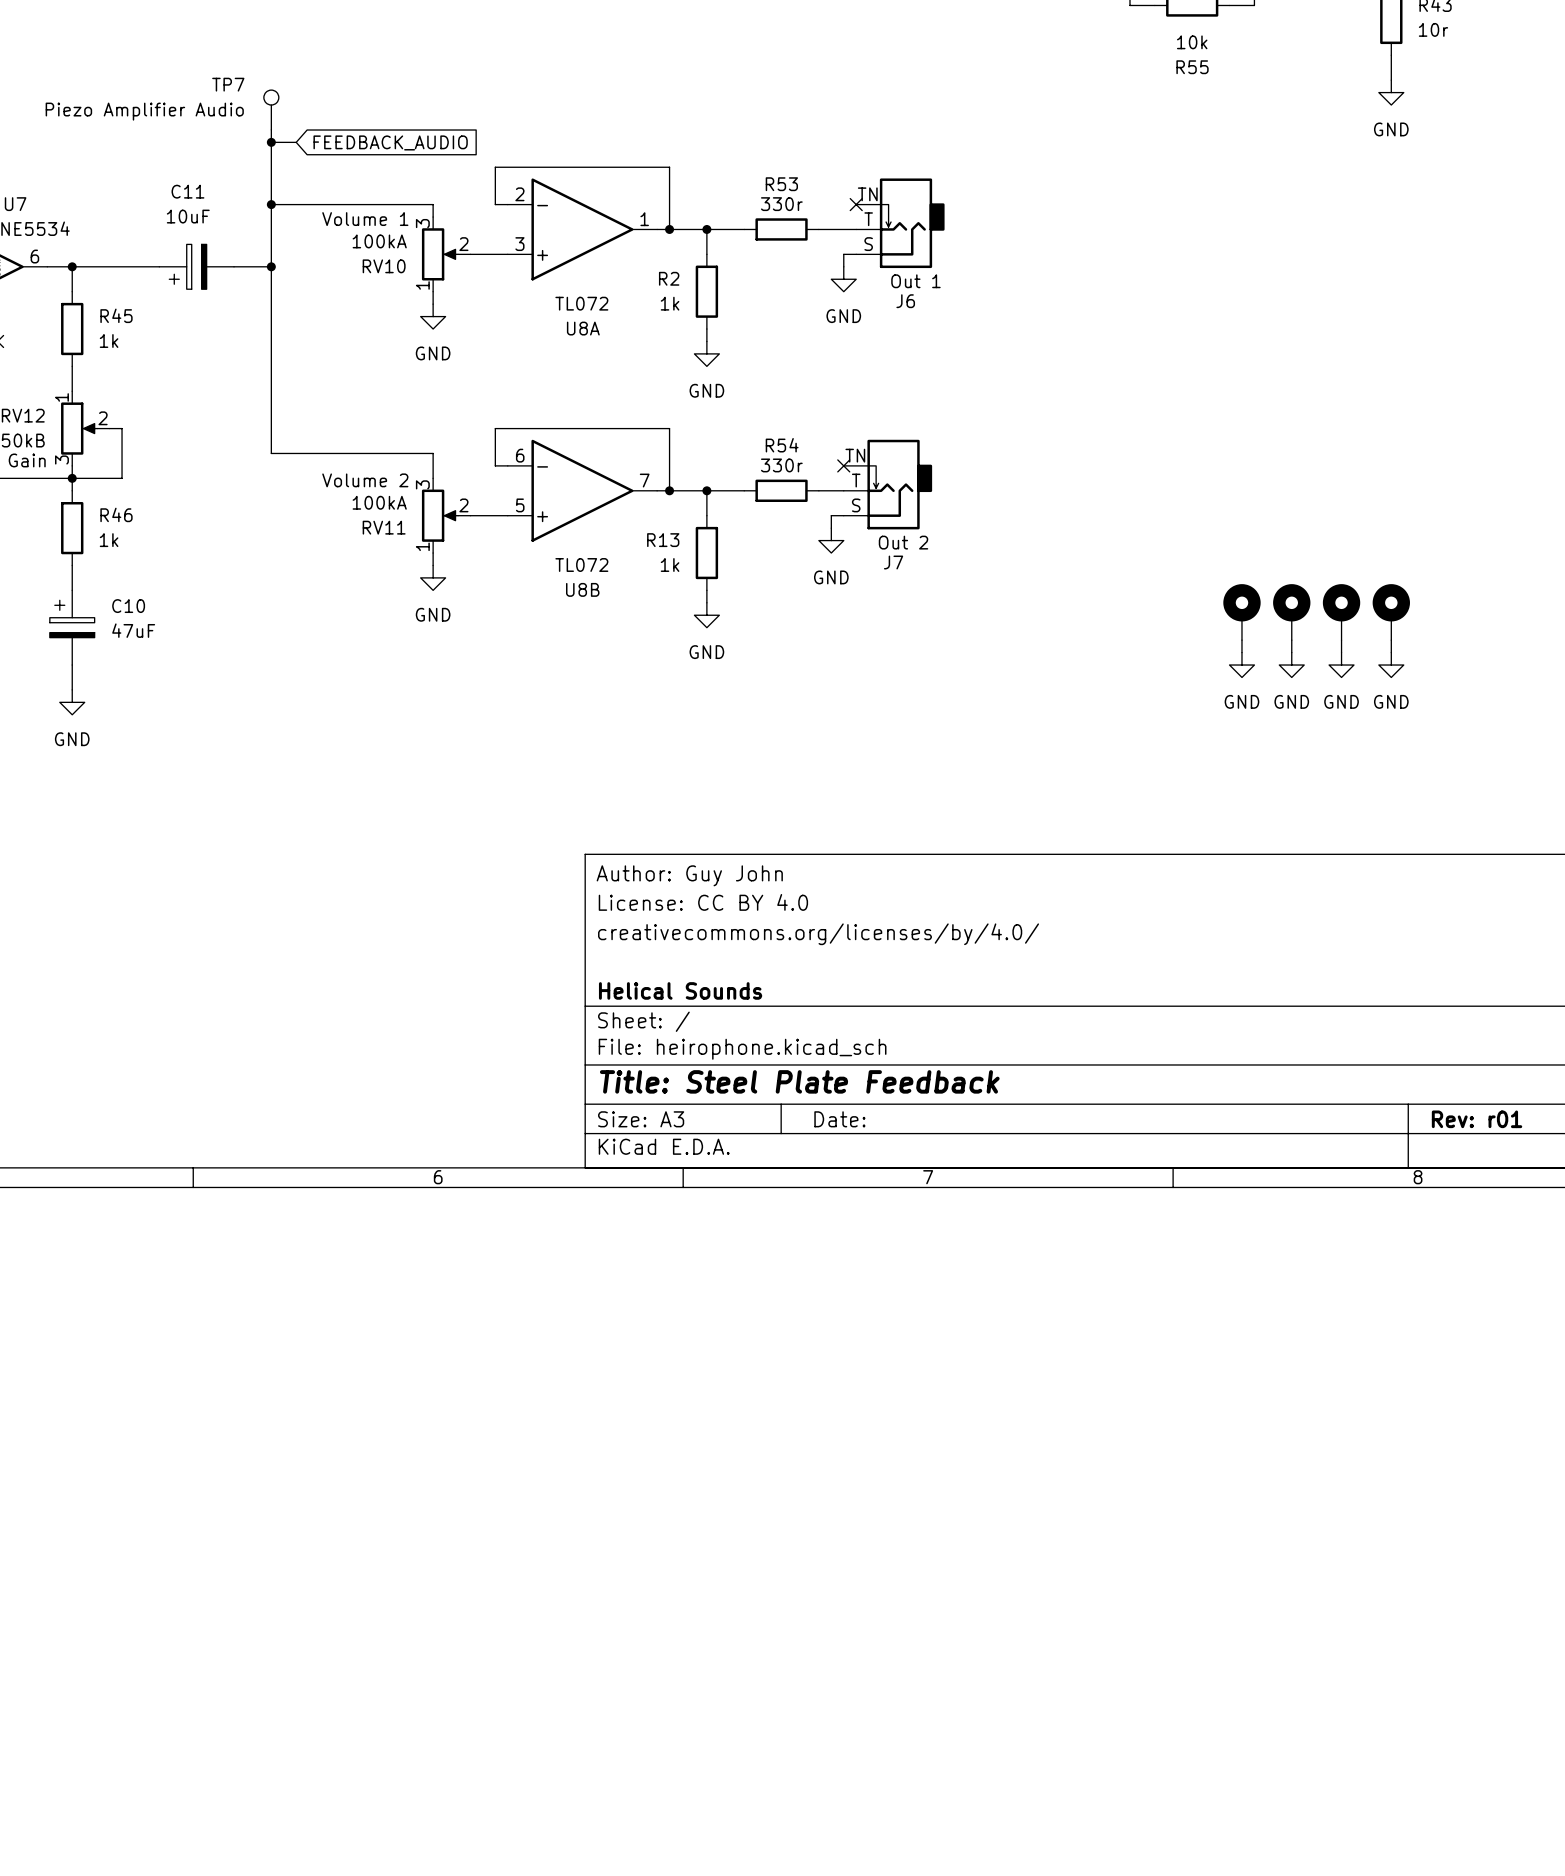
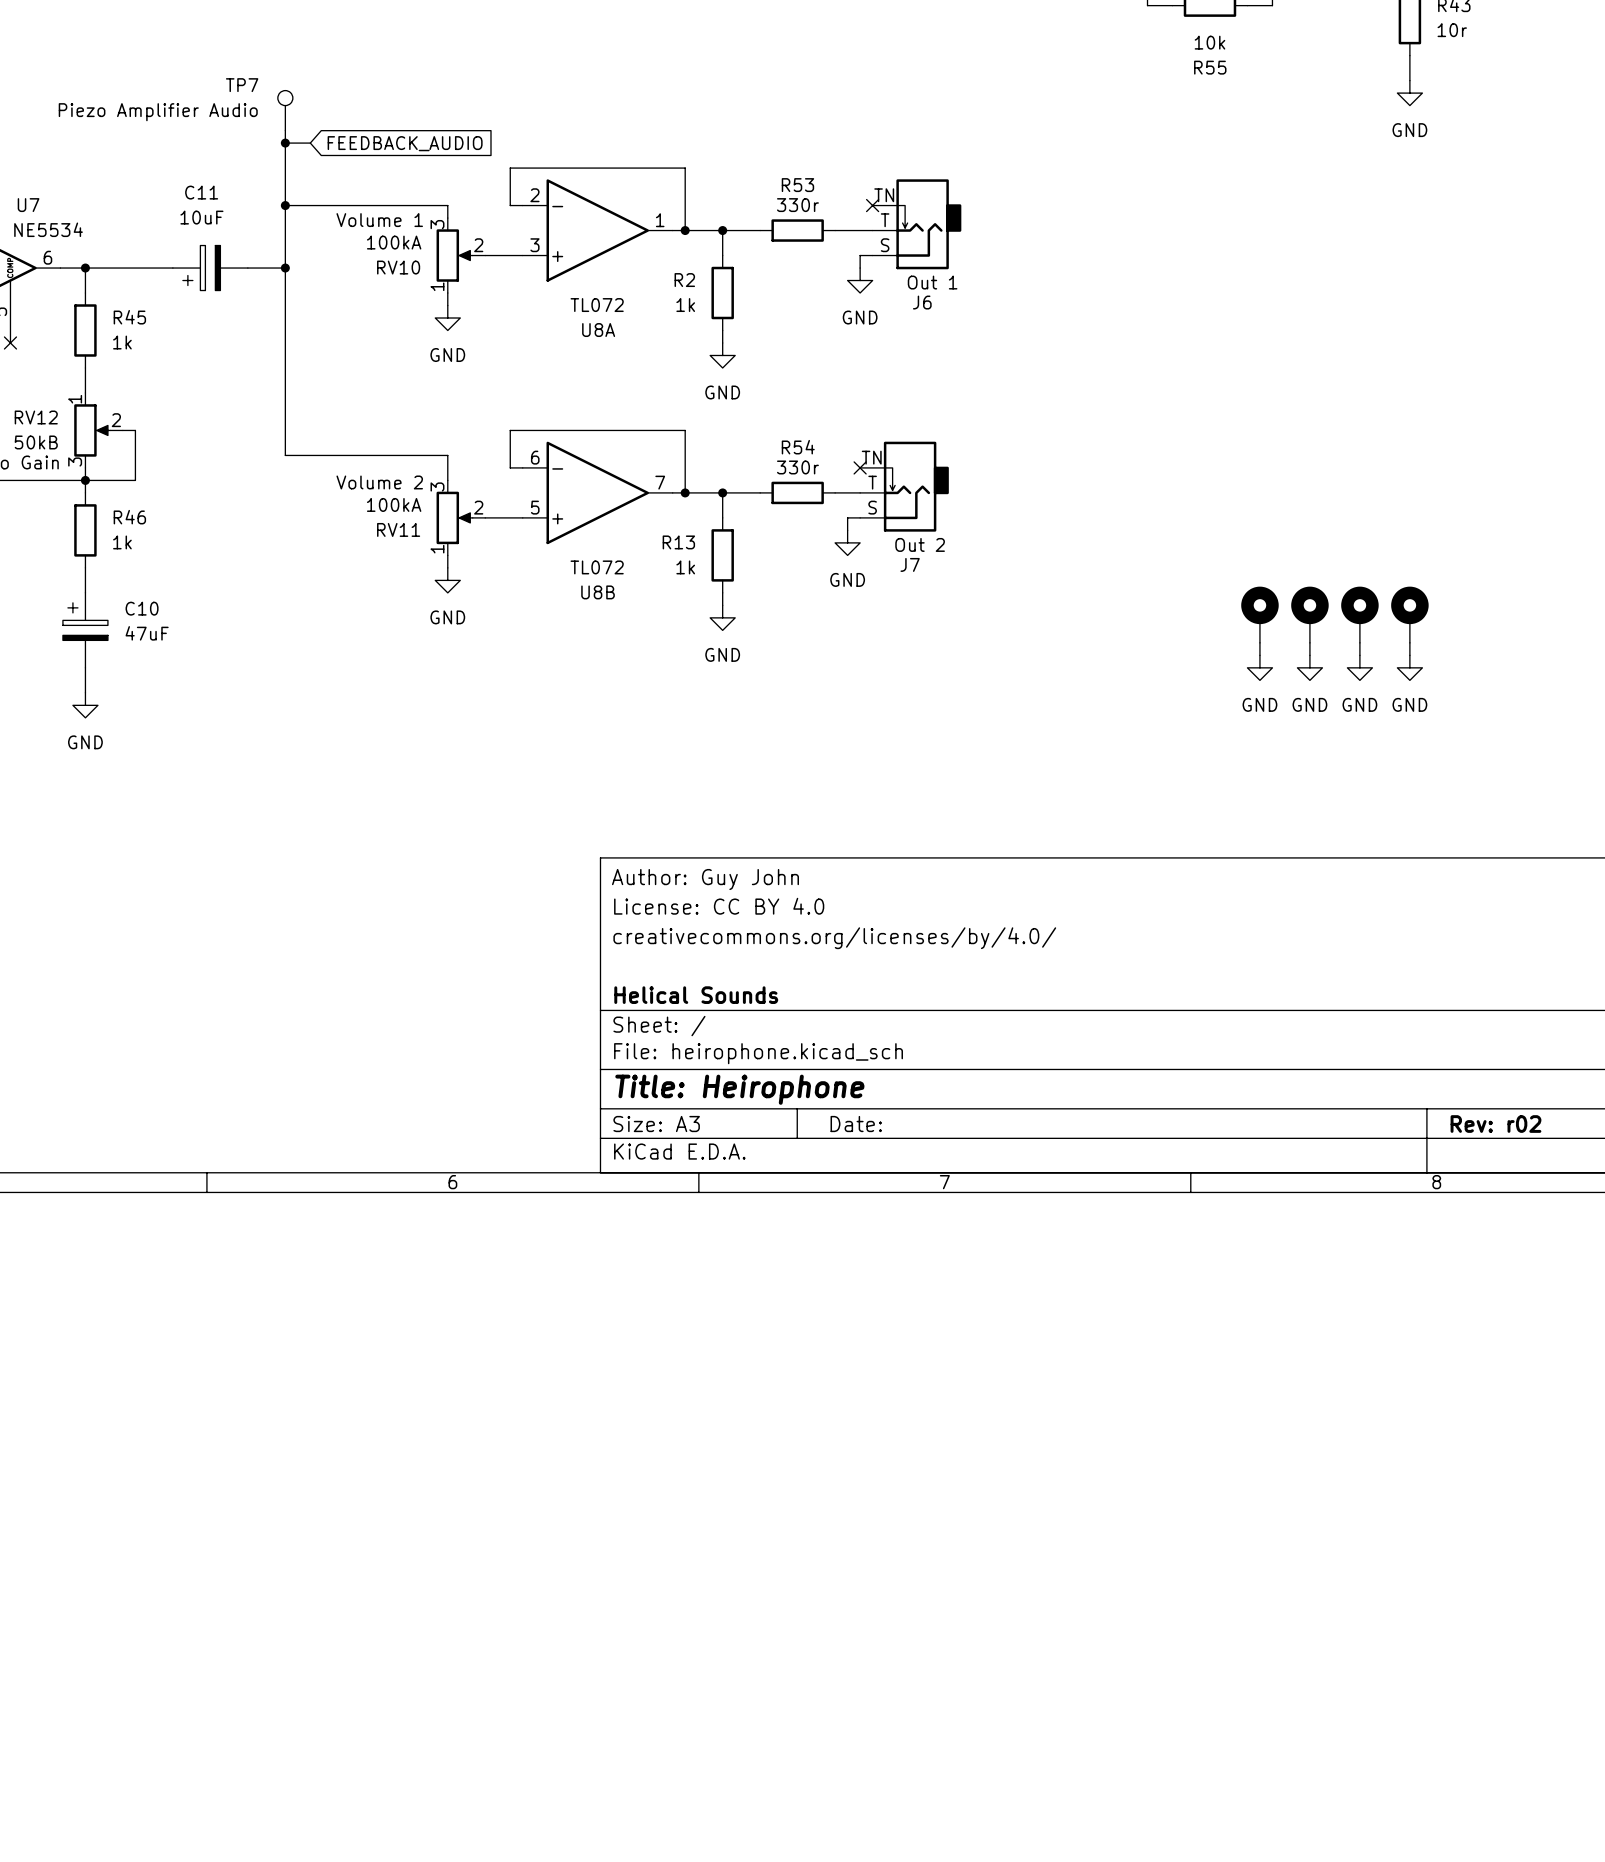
title block: Title: Steel Plate Feedback (799, 1081) -> Title: Heirophone (739, 1089)
title block: Rev: r01 (1477, 1119) -> Rev: r02 (1495, 1124)

